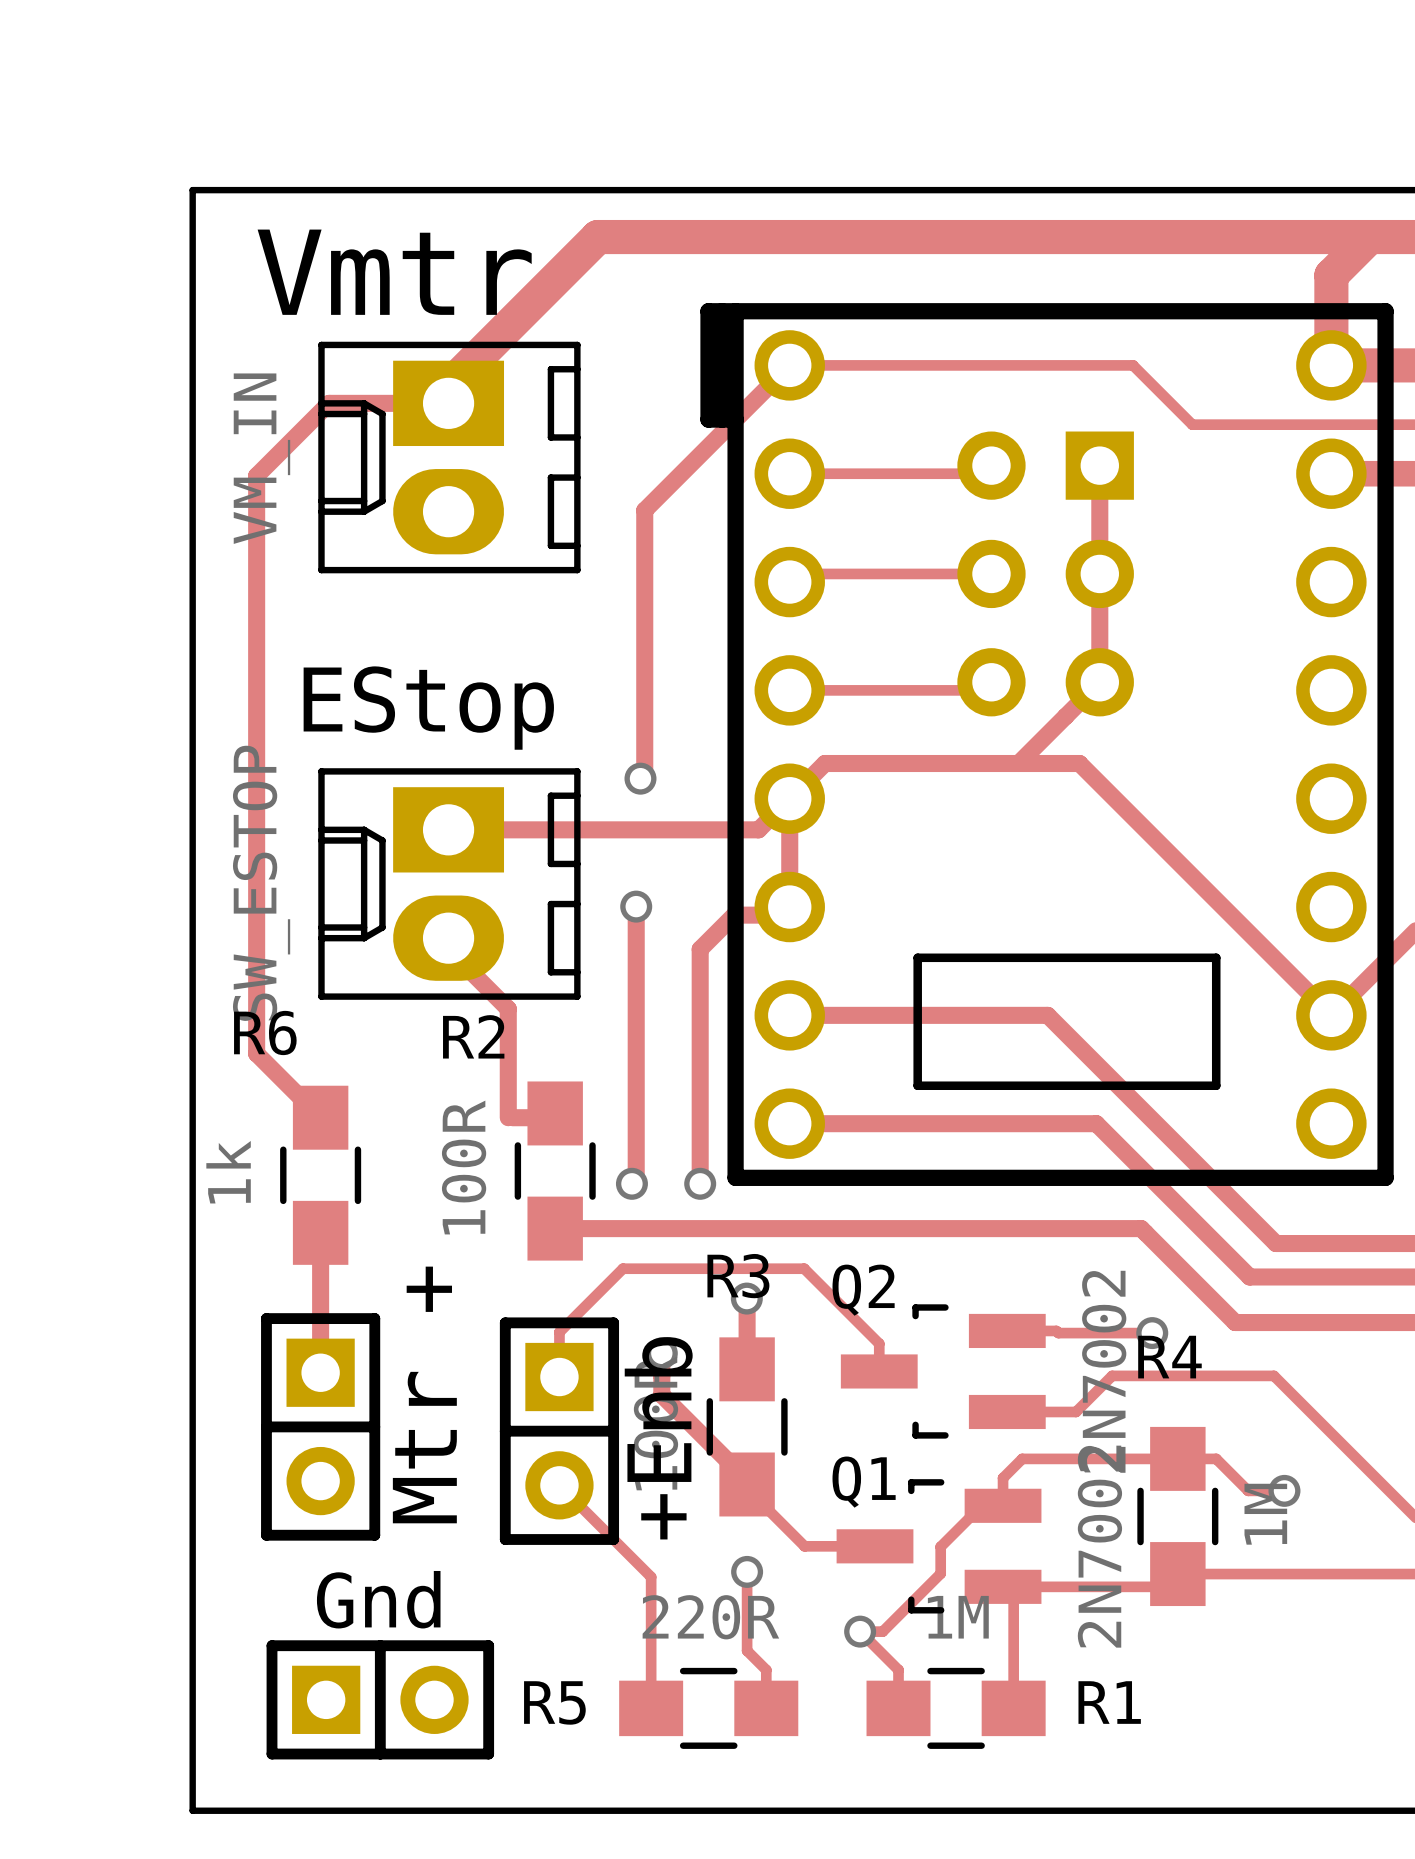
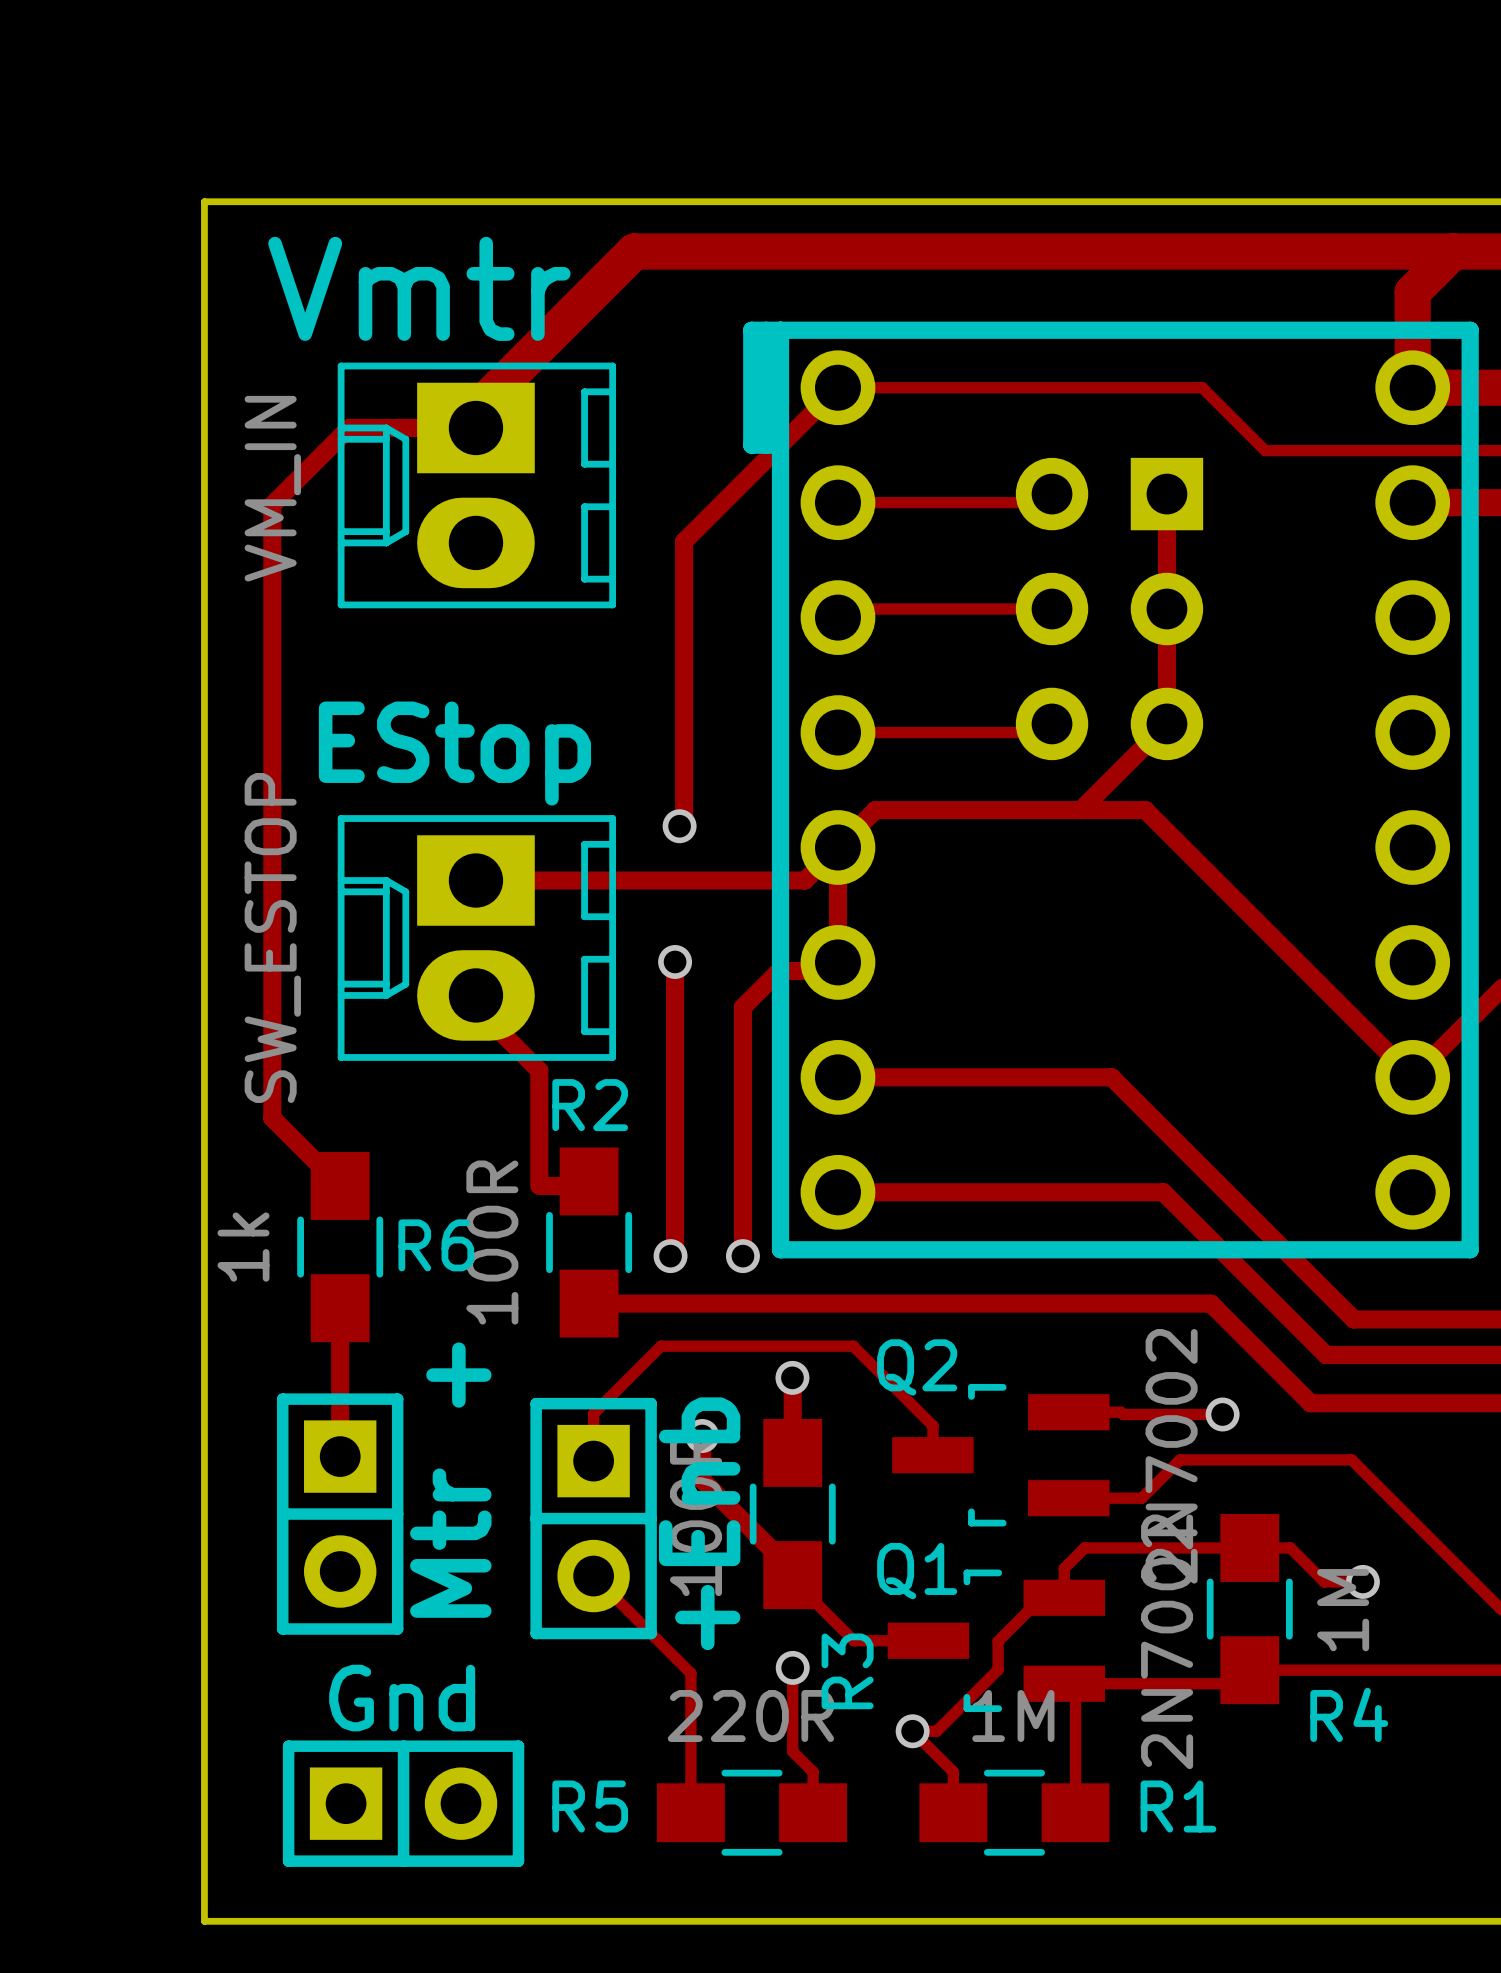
line: (917, 957) (917, 1085) (1216, 1085) (1216, 957) (917, 957) -> none
R6 name position: R6 (265, 1032) -> R6 (436, 1245)
R2 name position: R2 (473, 1036) -> R2 (590, 1105)
R3 name rotation: 0° (738, 1276) -> 90° counterclockwise (847, 1671)
R3 name position: R3 (738, 1276) -> R3 (847, 1671)
R4 name position: R4 (1169, 1357) -> R4 (1349, 1714)

